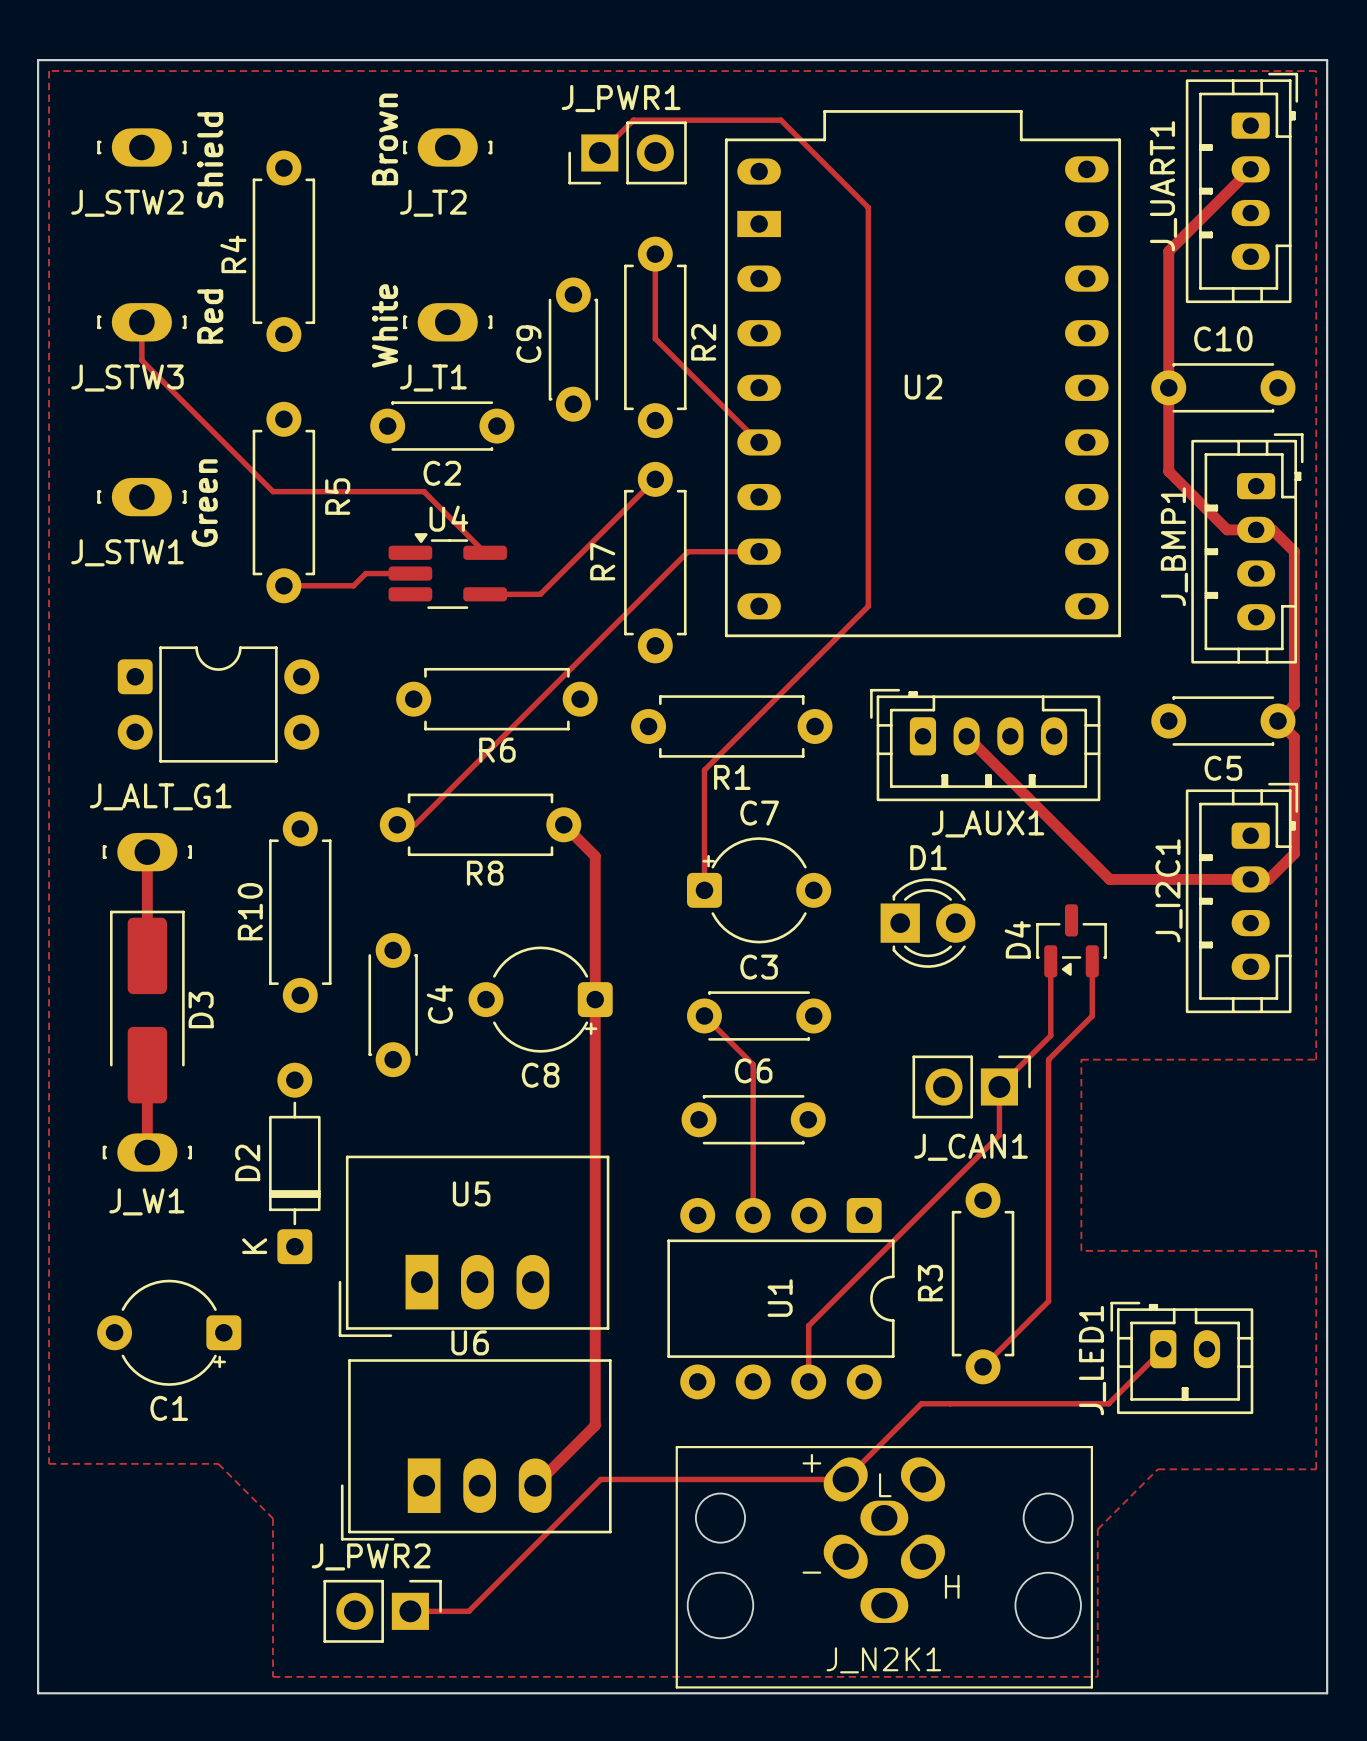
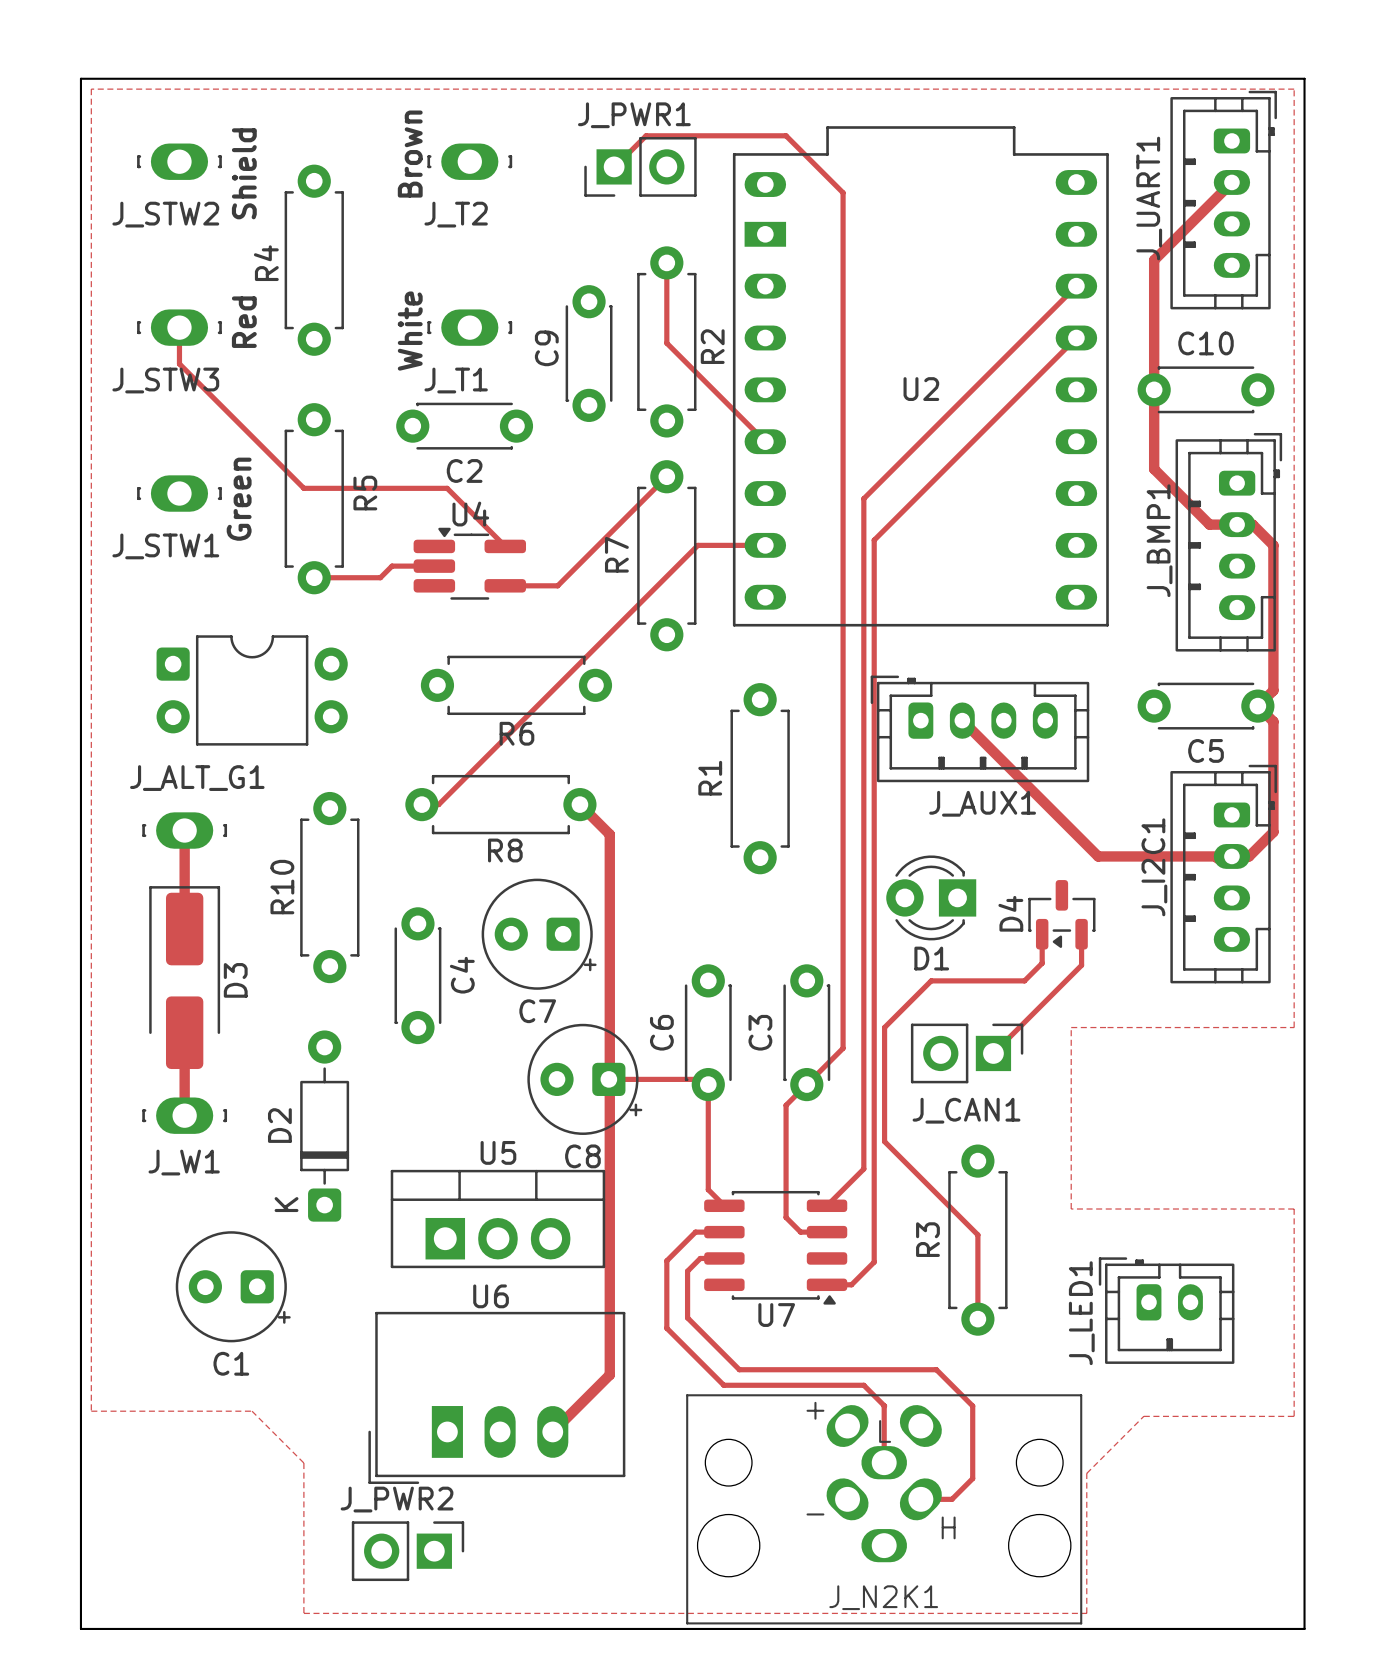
track: (841, 180) (868, 207) (868, 606) (704, 770) (704, 890) -> (843, 192) (843, 1048) (786, 1105) (786, 1217) (800, 1232) (827, 1232)
track: none -> (1076, 286) (863, 498) (863, 1168) (827, 1205)
track: none -> (1076, 337) (874, 540) (874, 1262) (851, 1284) (827, 1284)
R1 rotation: 0° (731, 726) -> 90° clockwise (760, 778)
C7 name position: C7 (759, 813) -> C7 (537, 1011)
C7 footprint: [687, 837, 832, 944] -> [481, 878, 597, 990]
D1 rotation: 0° (927, 923) -> 180° (931, 897)
C8 footprint: [468, 946, 613, 1053] -> [527, 1023, 643, 1135]
C3 name position: C3 (759, 967) -> C3 (760, 1032)
track: (1050, 991) (1050, 1035) -> (1081, 965) (1042, 1004)
track: (1092, 994) (1092, 1015) (1048, 1059) (1048, 1301) (983, 1366) -> (1042, 963) (1024, 980) (931, 980) (884, 1027) (884, 1141) (977, 1234) (977, 1319)
track: (704, 1015) (753, 1064) (753, 1215) -> none
C3 rotation: 0° (759, 1015) -> 90° clockwise (806, 1032)
C6 name position: C6 (753, 1070) -> C6 (661, 1032)
track: (999, 1086) (999, 1135) (808, 1325) (808, 1381) -> none
track: none -> (608, 1079) (703, 1079) (708, 1084) (708, 1189) (724, 1205)
C6 rotation: 0° (753, 1119) -> 90° clockwise (708, 1032)
U5 footprint: [338, 1155, 610, 1337] -> [390, 1169, 606, 1269]
track: none -> (724, 1232) (695, 1232) (666, 1260) (666, 1328) (723, 1385) (863, 1385) (884, 1406) (884, 1462)
C1 footprint: [97, 1279, 242, 1386] -> [175, 1231, 291, 1343]
U7: none -> (775, 1247)
U1: (780, 1298) -> none
track: none -> (724, 1258) (700, 1258) (687, 1271) (687, 1317) (739, 1369) (936, 1369) (972, 1406) (972, 1478) (951, 1499) (920, 1499)
track: (1163, 1349) (1108, 1403) (921, 1403) (845, 1479) (600, 1479) (468, 1611) (410, 1611) -> none

